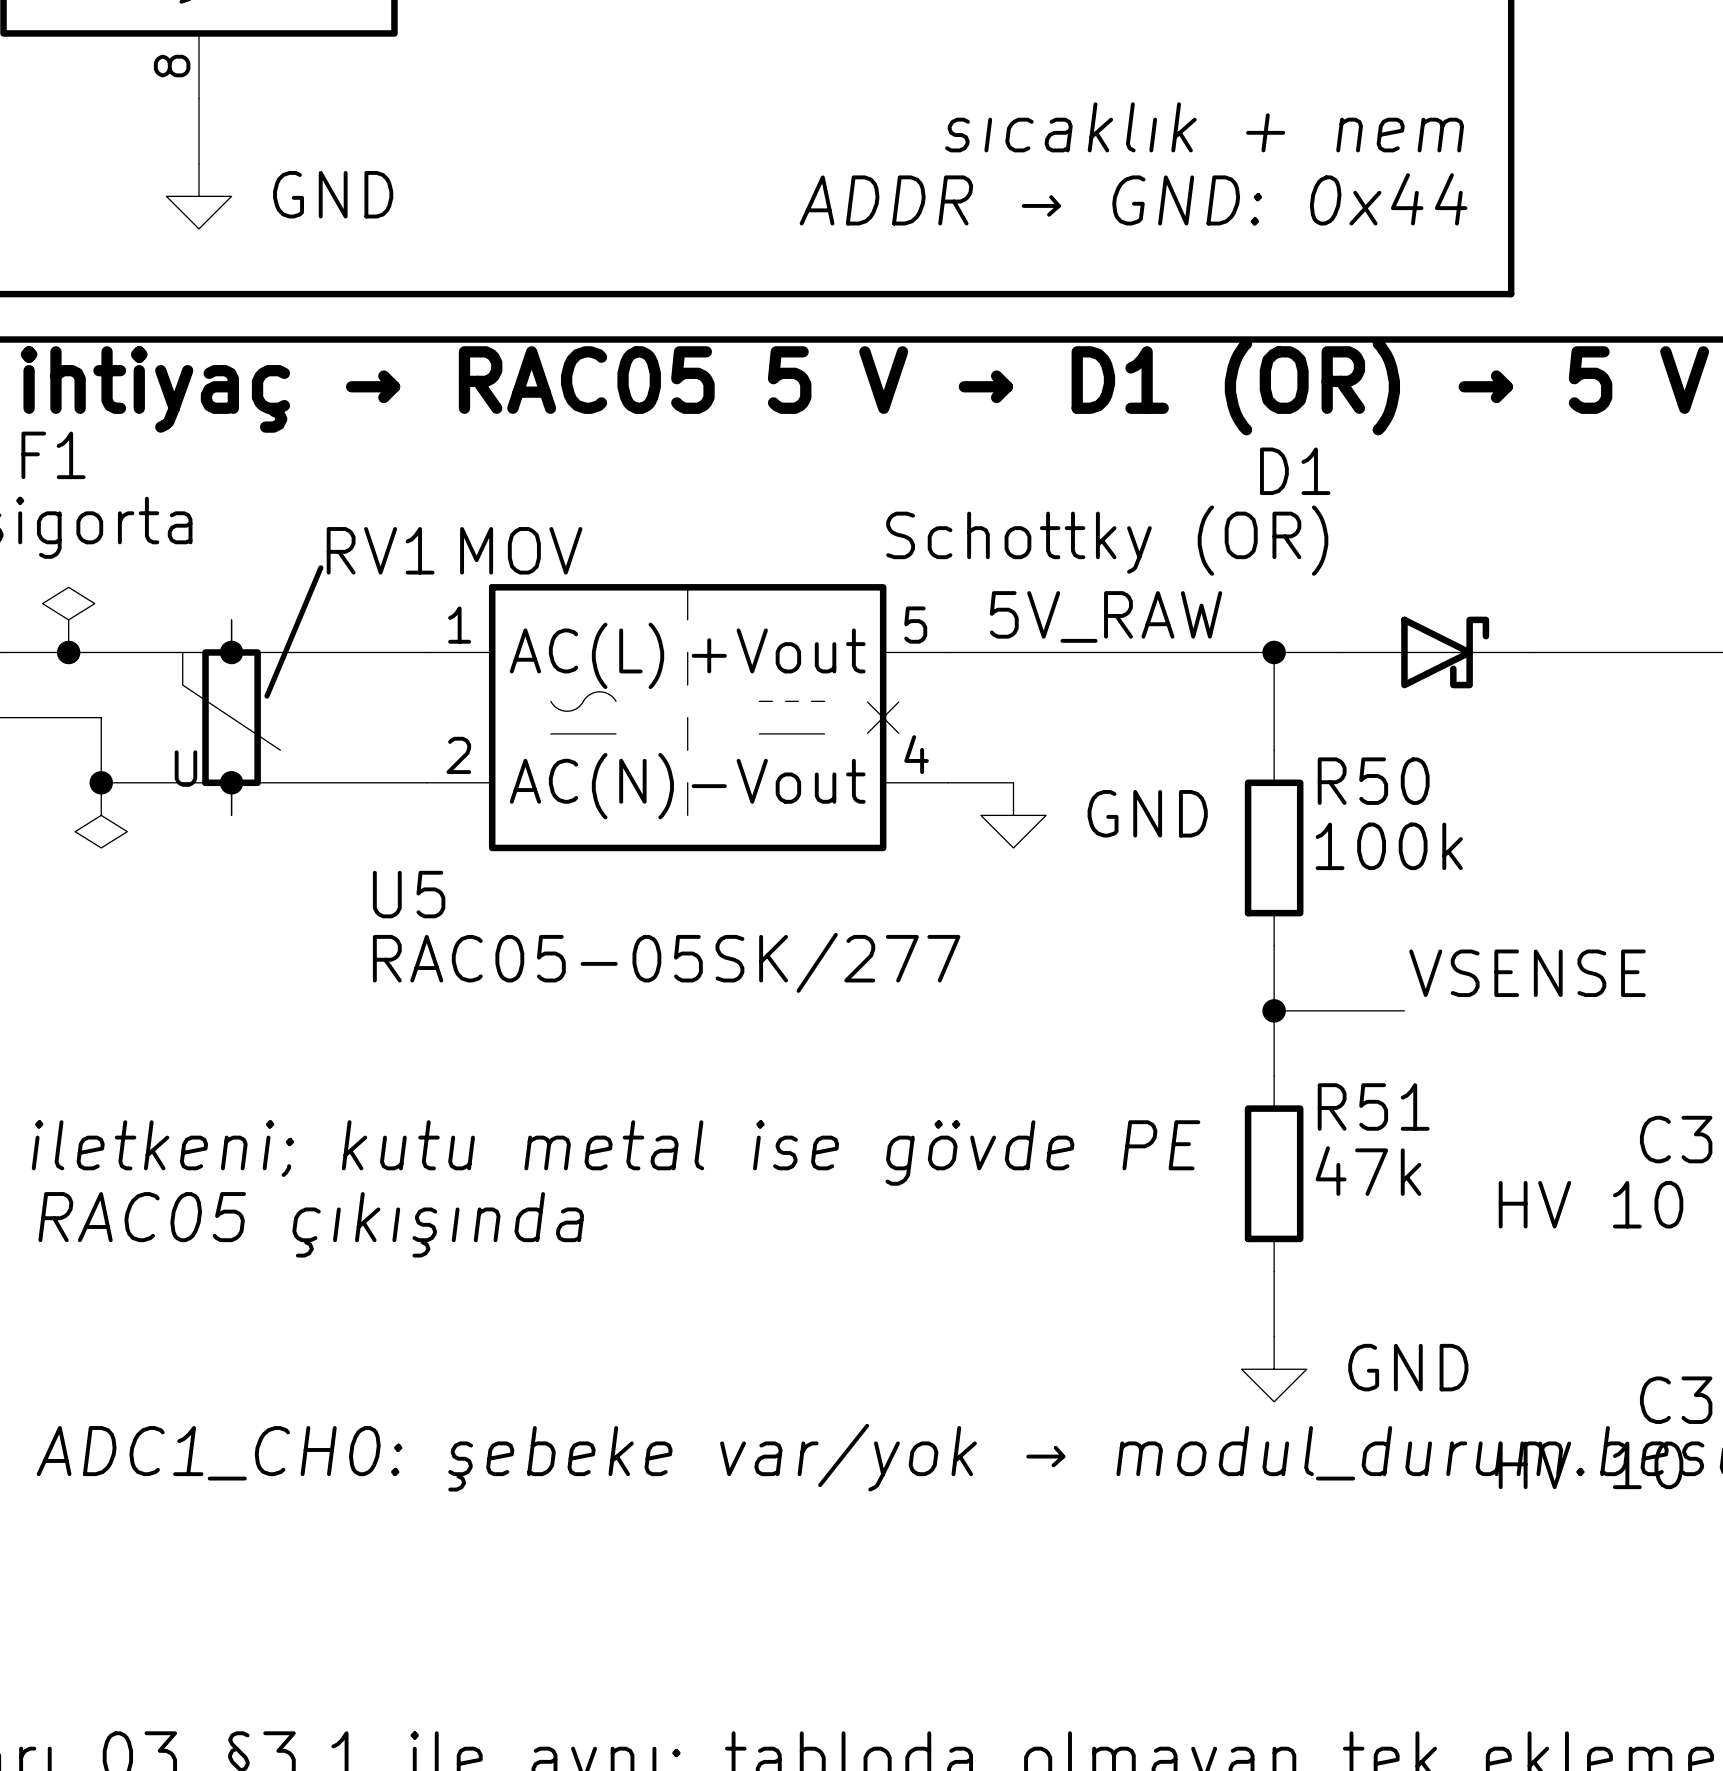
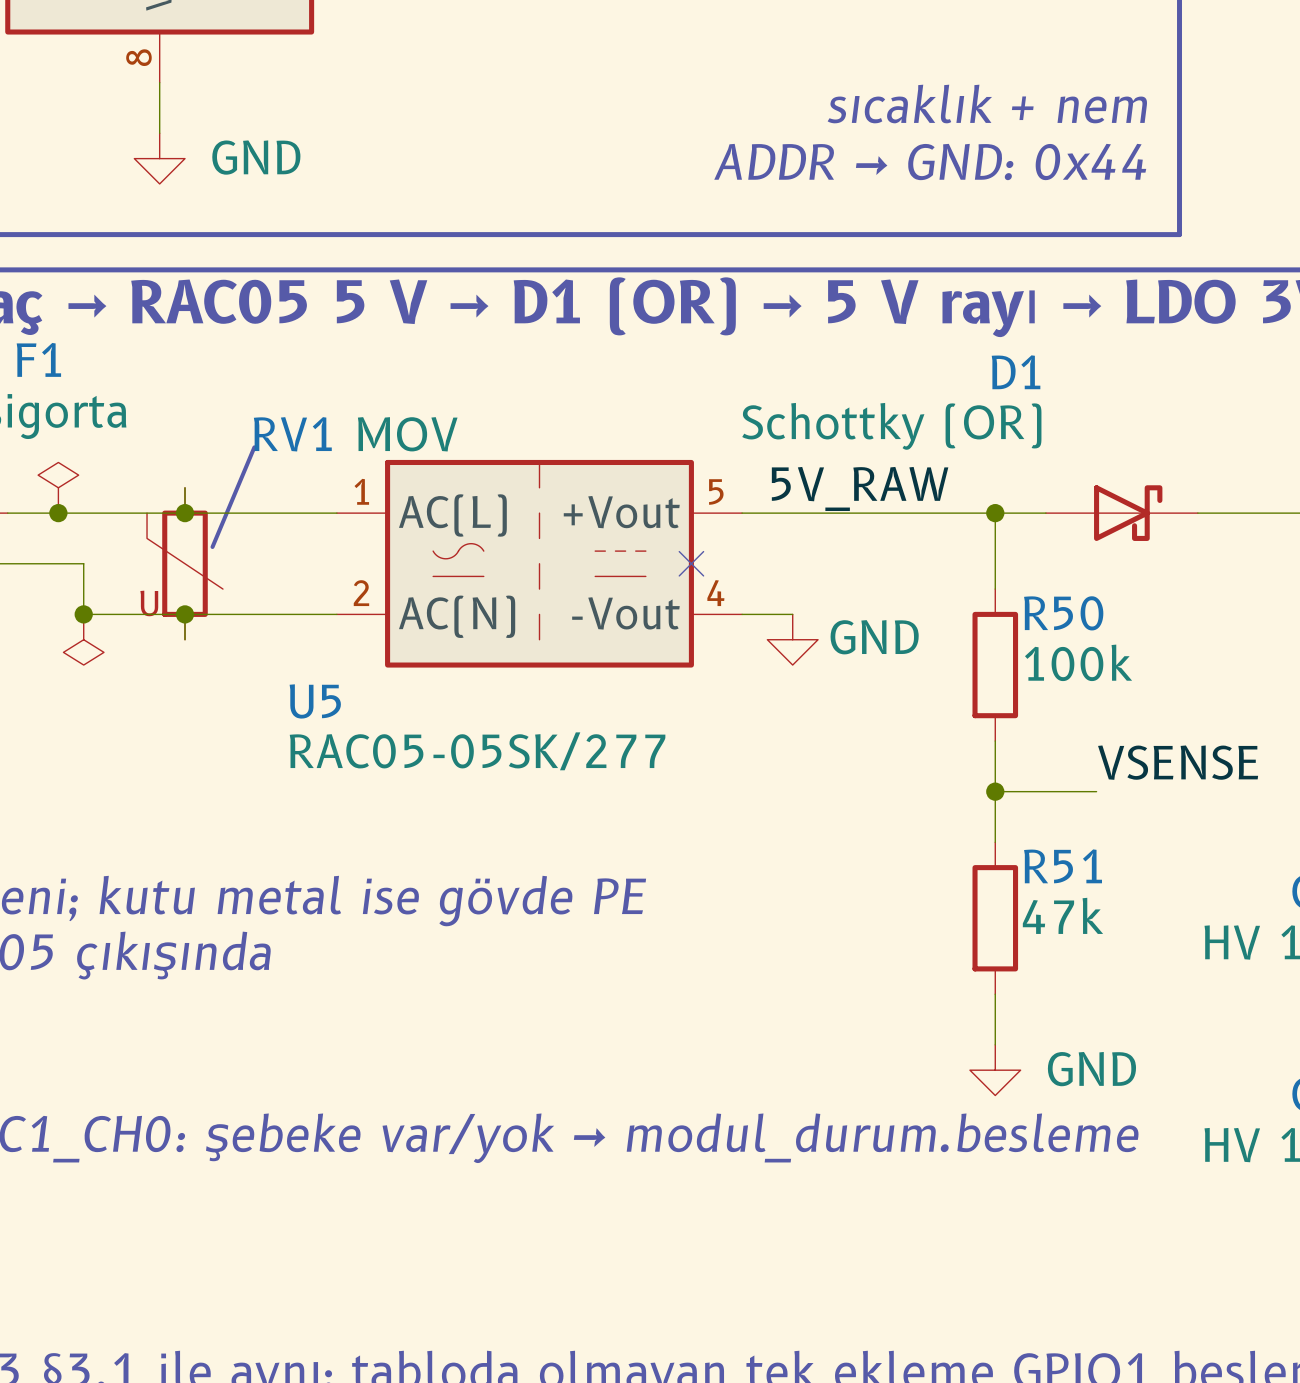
power symbol text position: GND (1147, 813) -> GND (874, 637)

